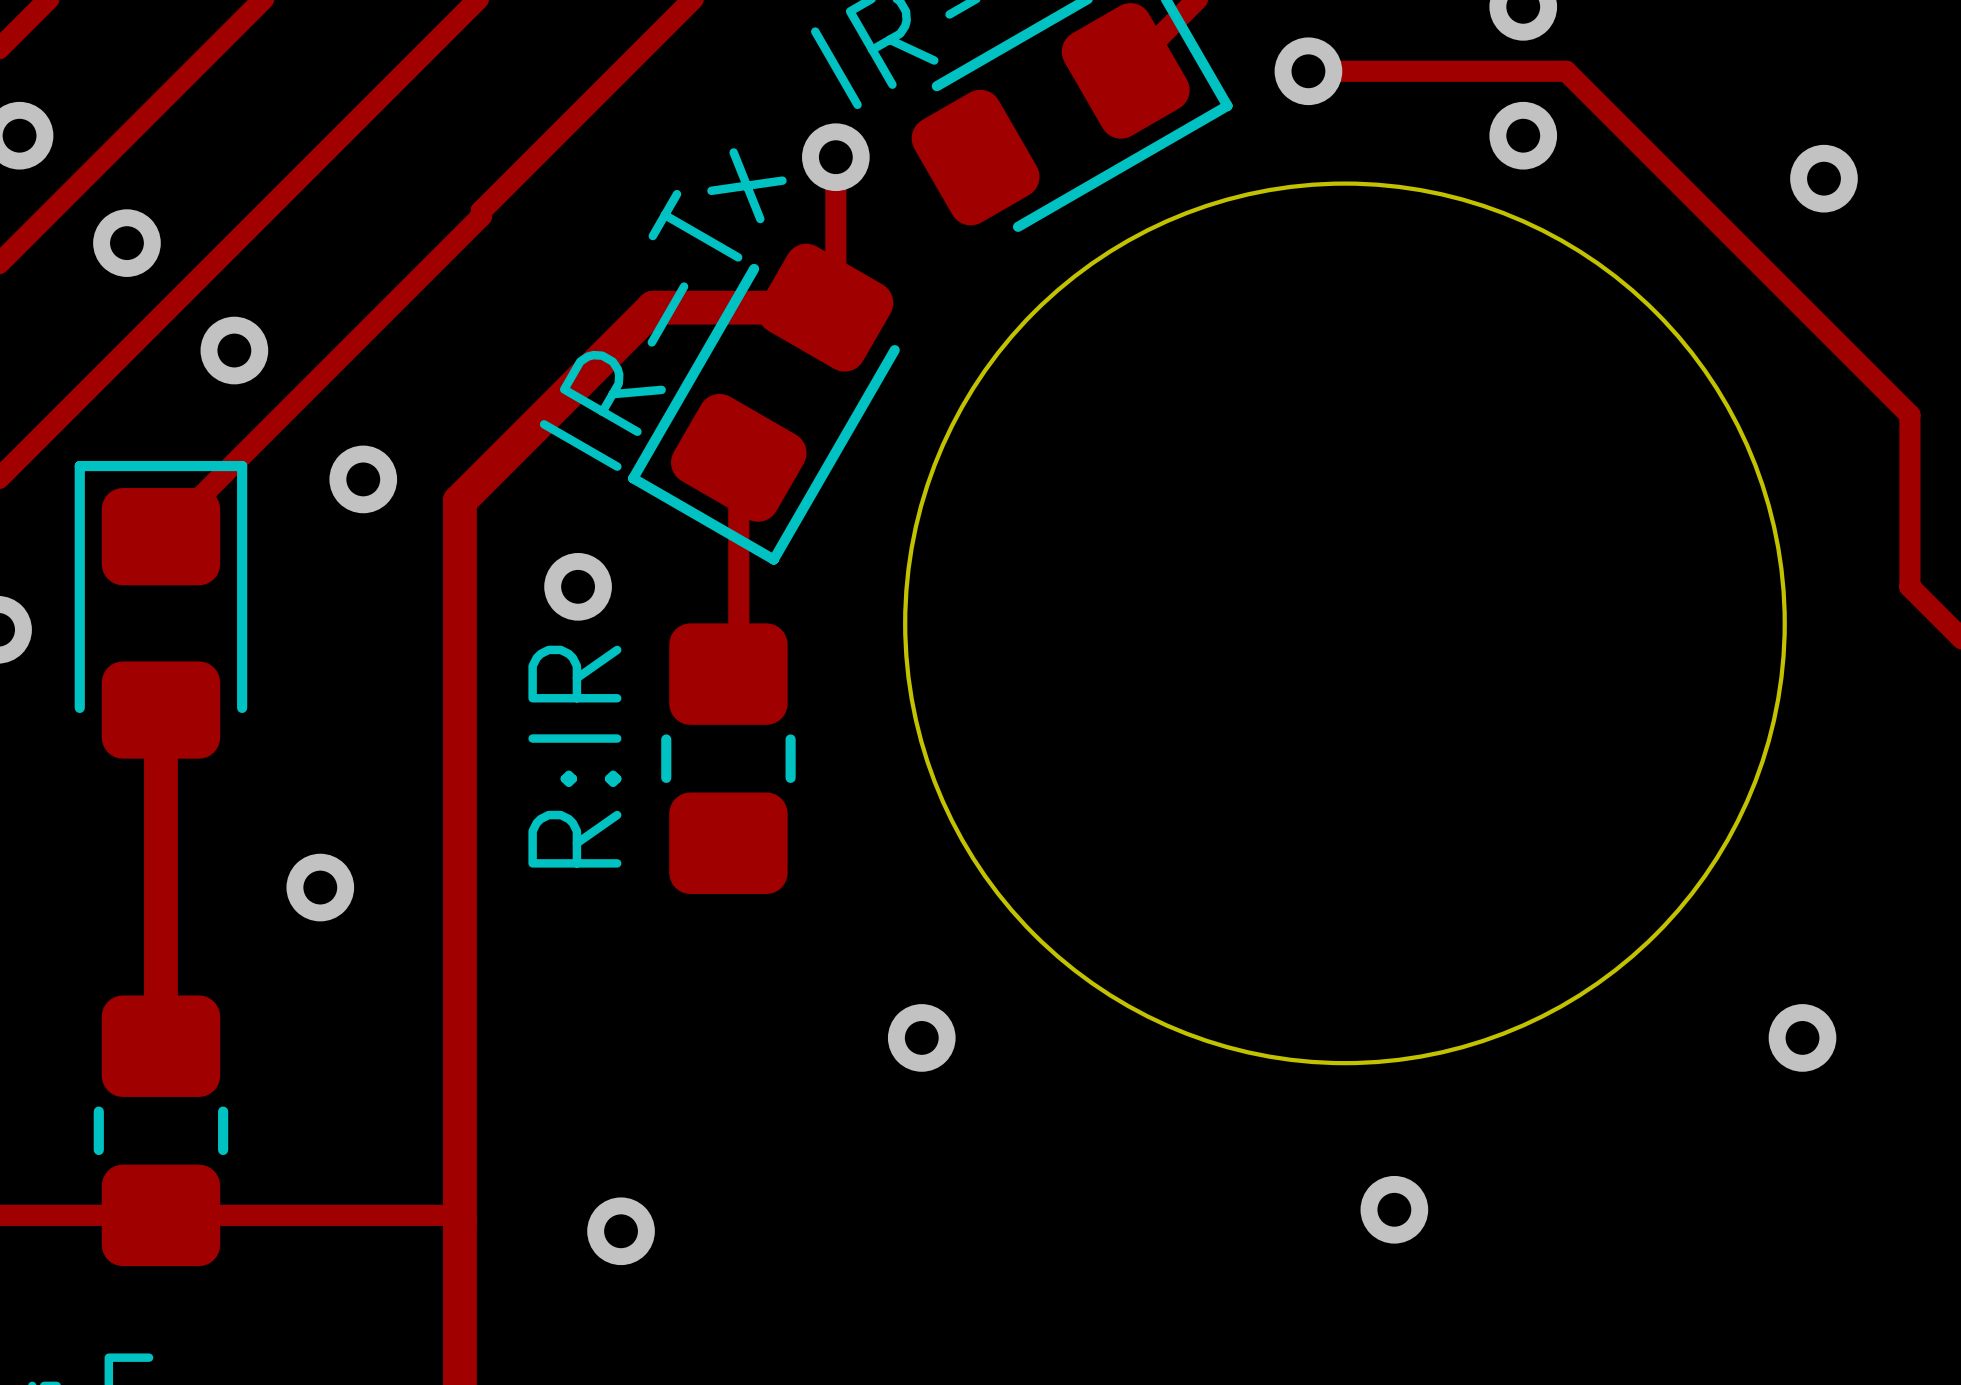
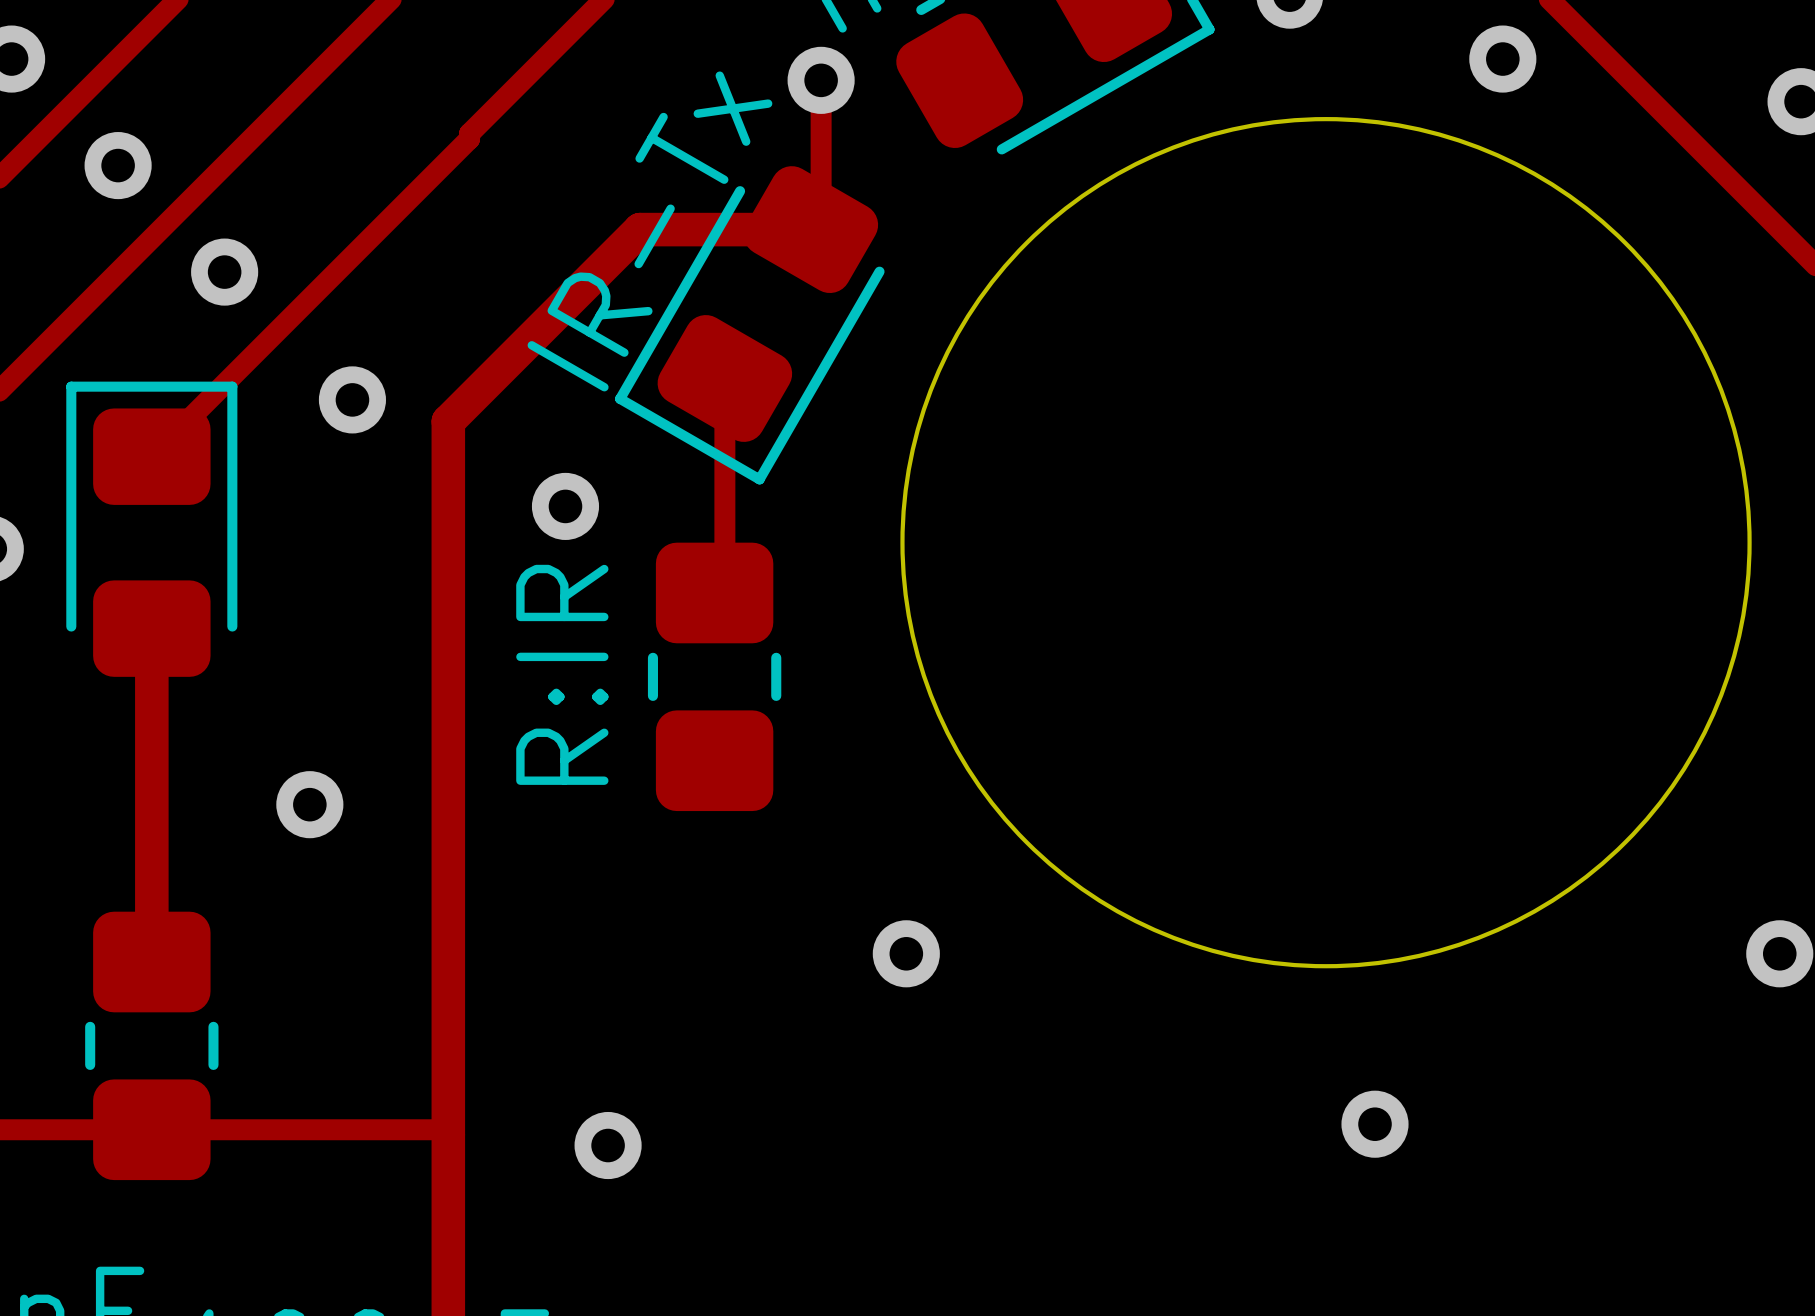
round board edge size: [903, 181, 1787, 1066] -> [900, 117, 1752, 969]

